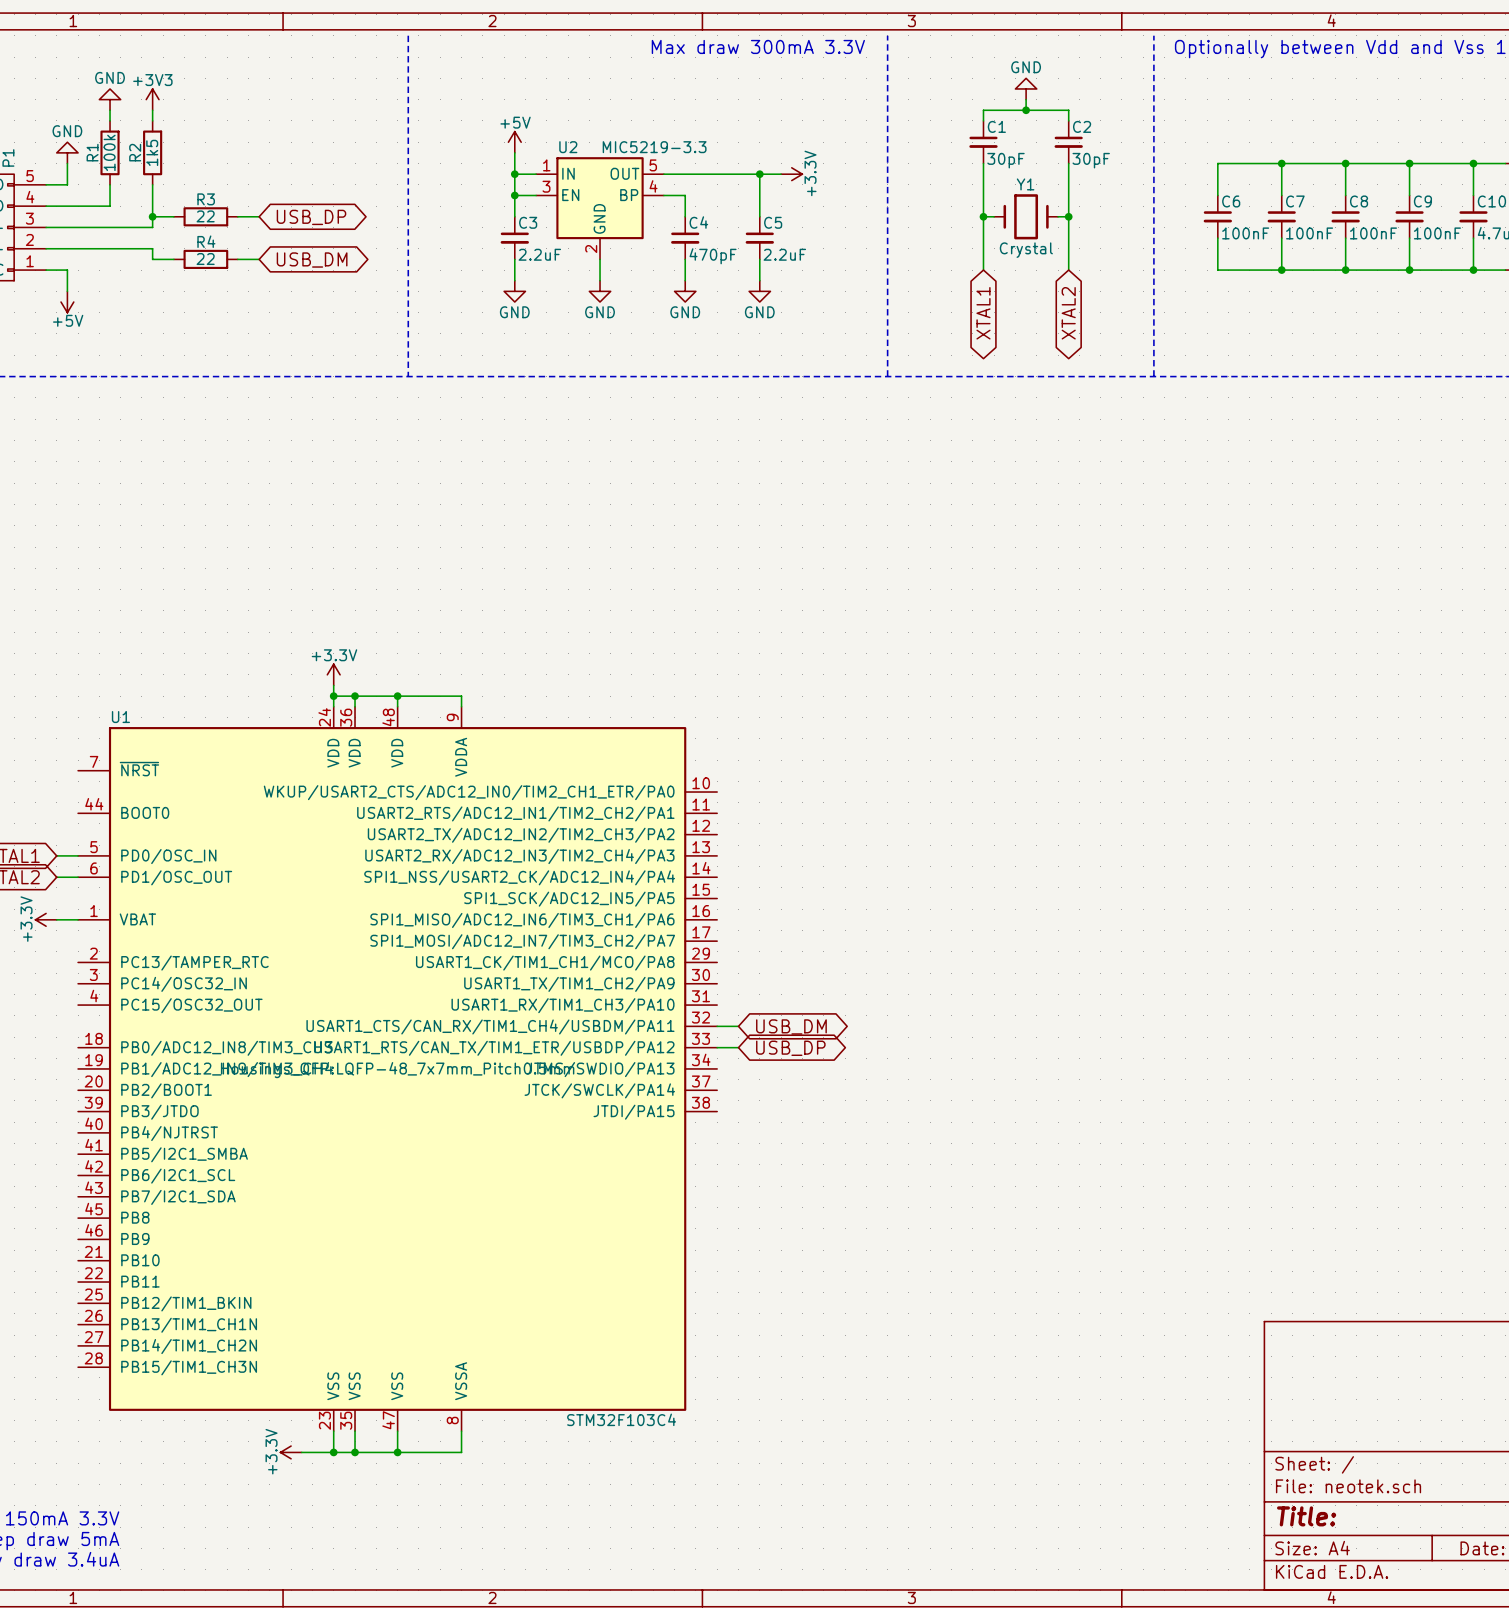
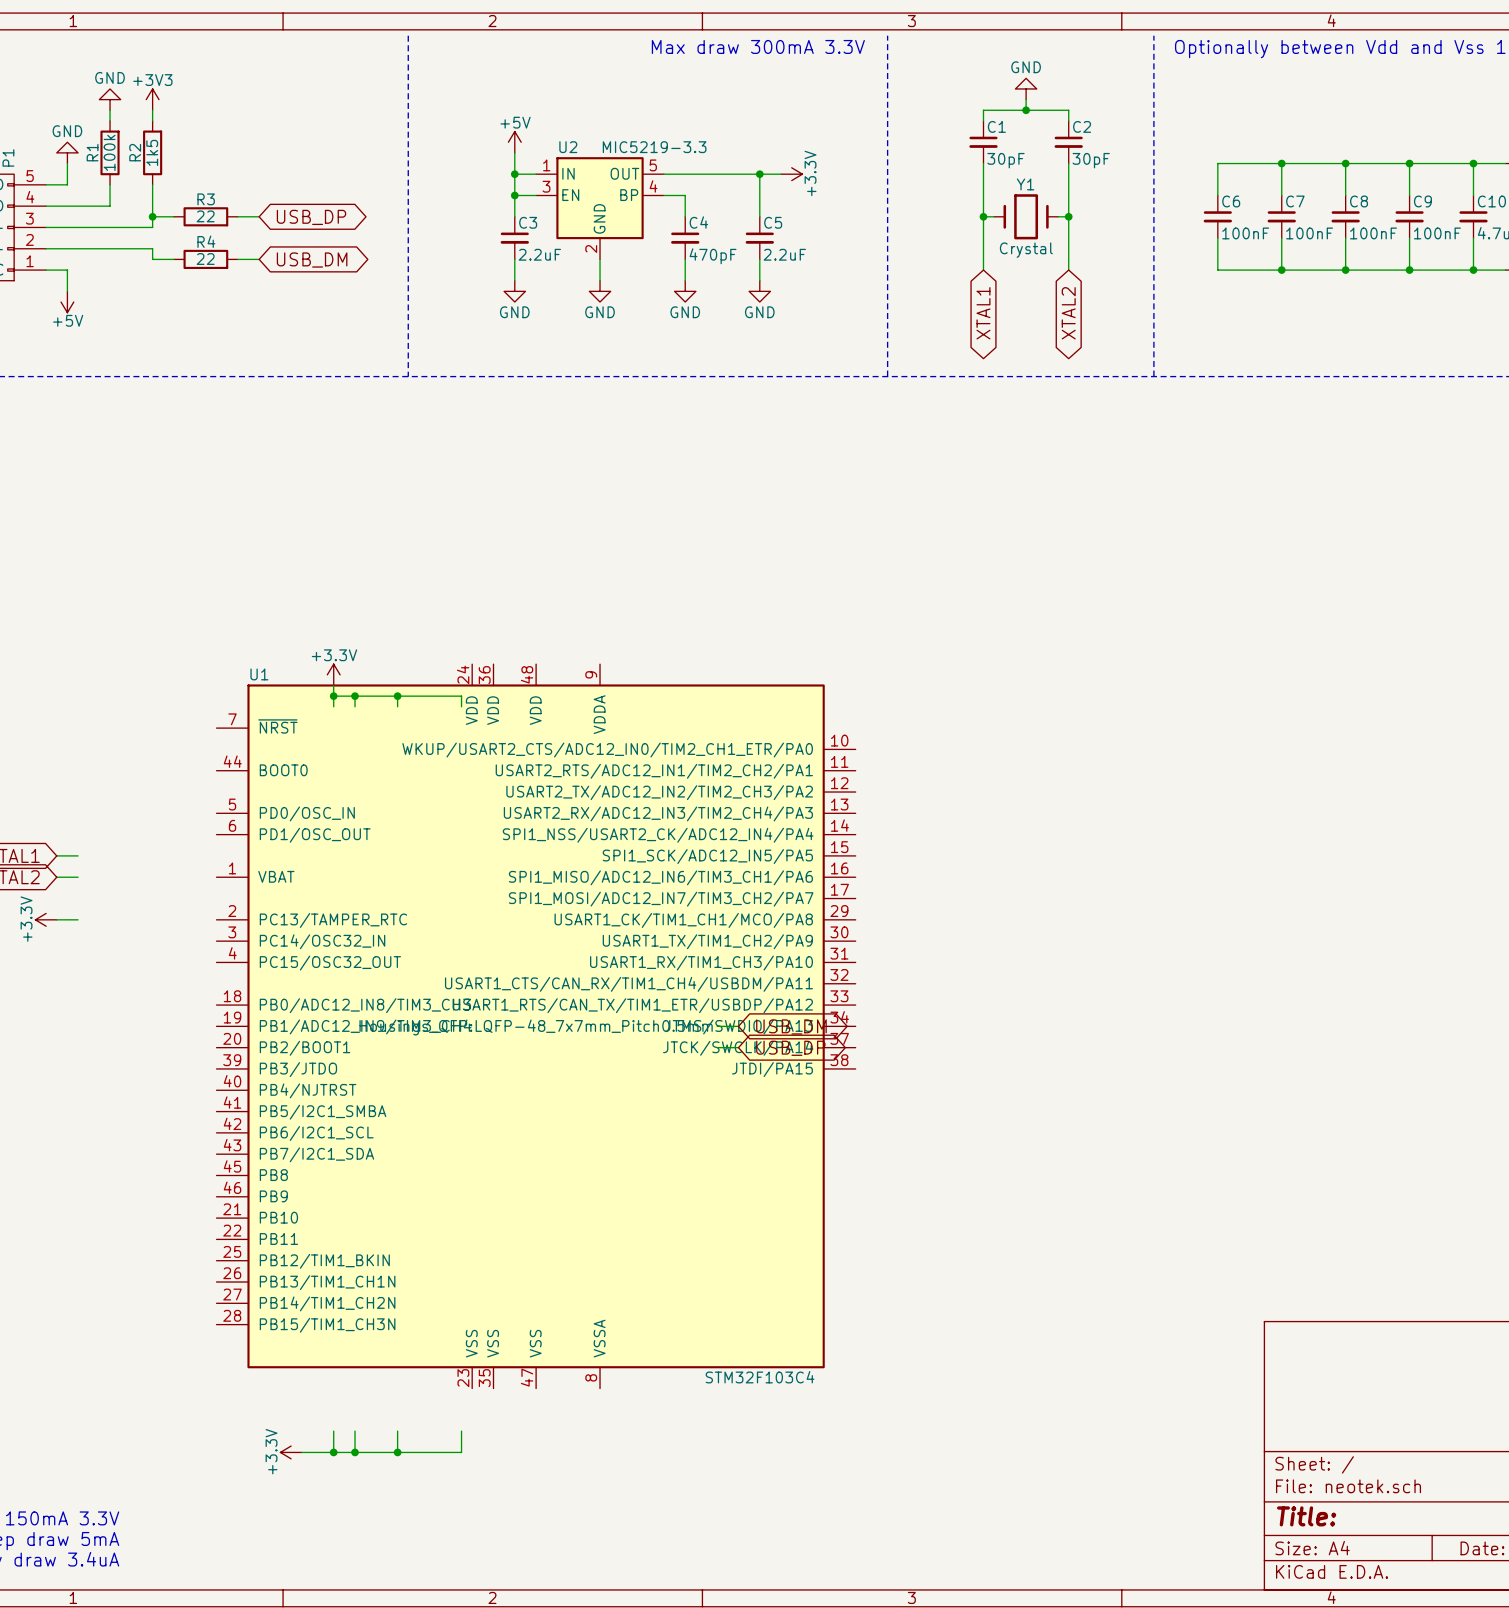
U1 position: (397, 1068) -> (536, 1026)

